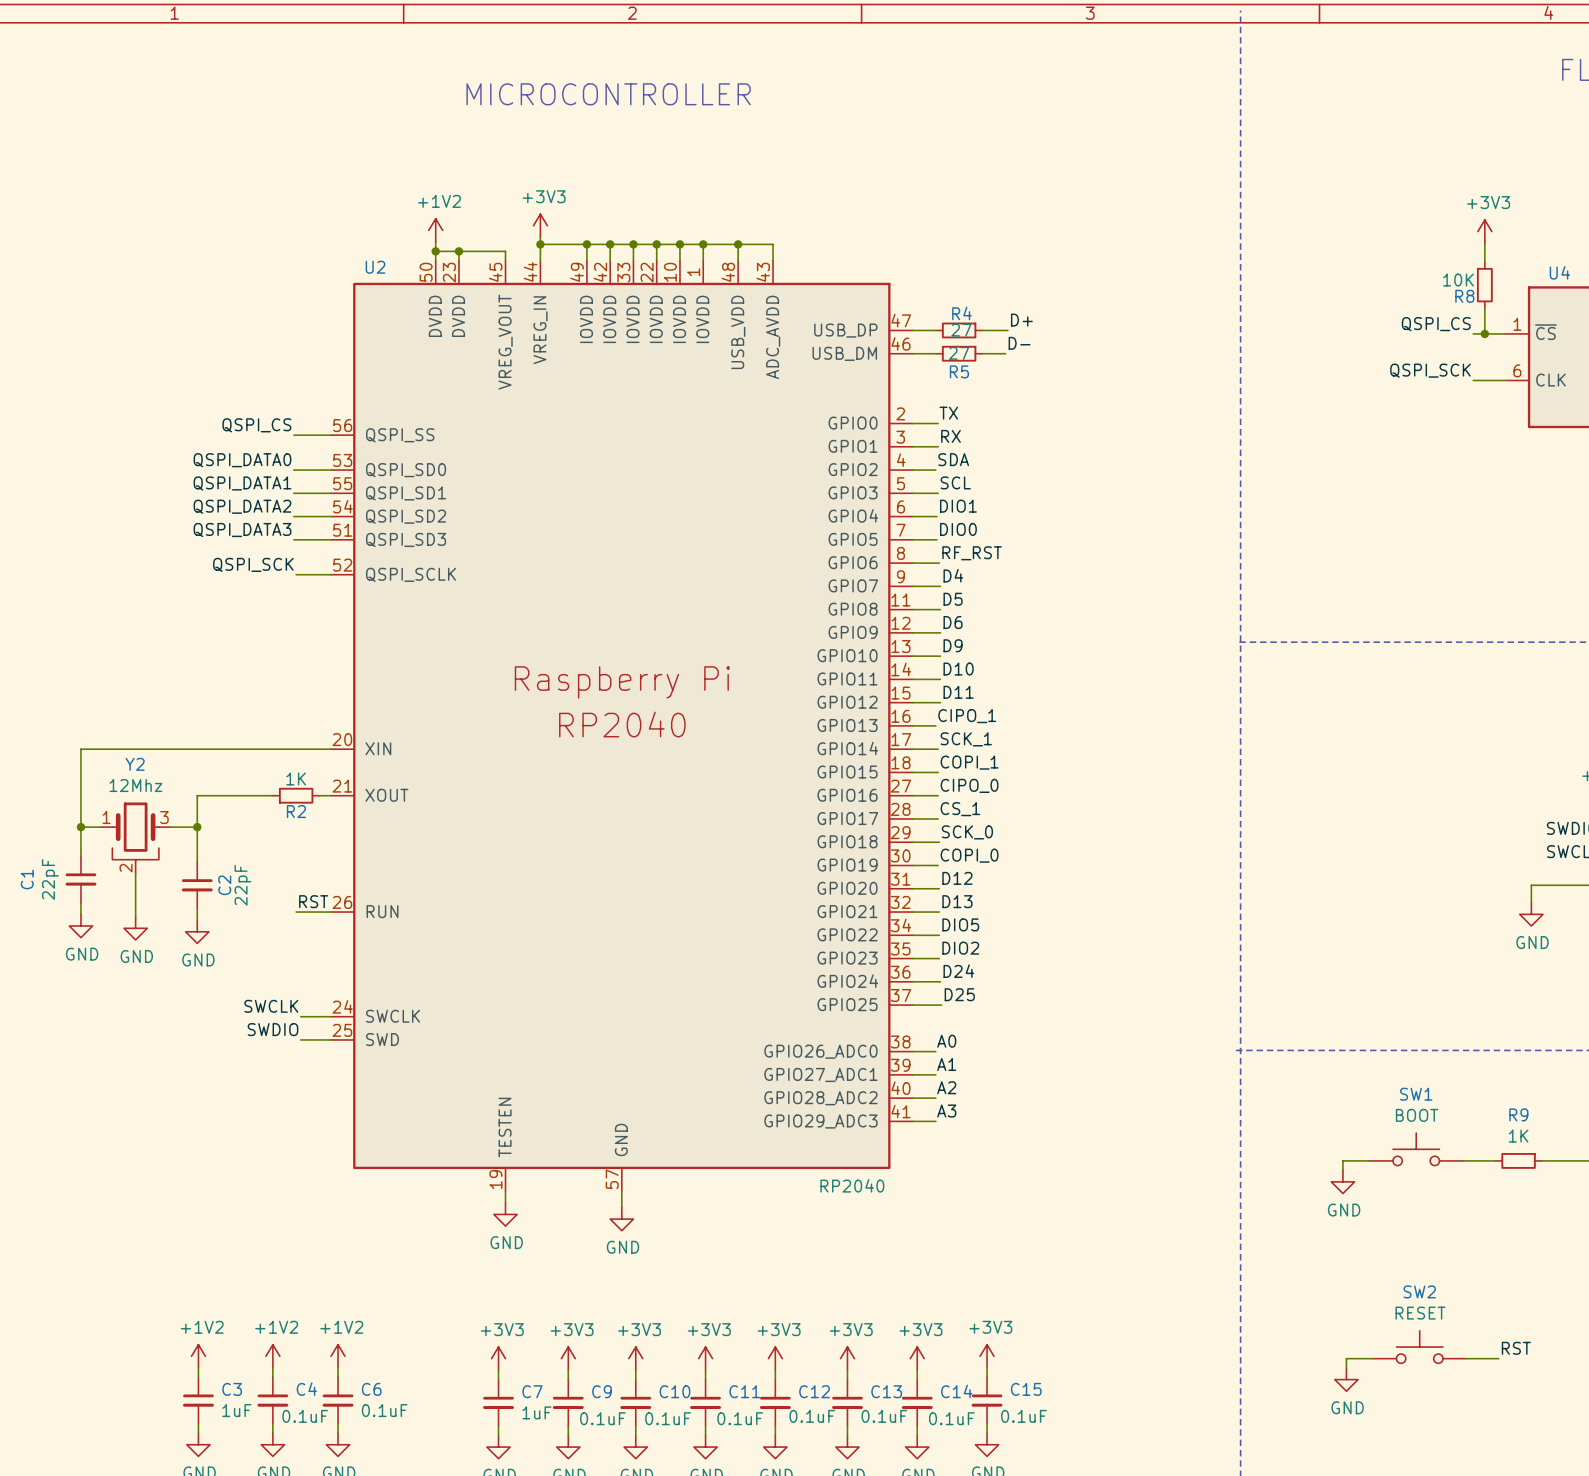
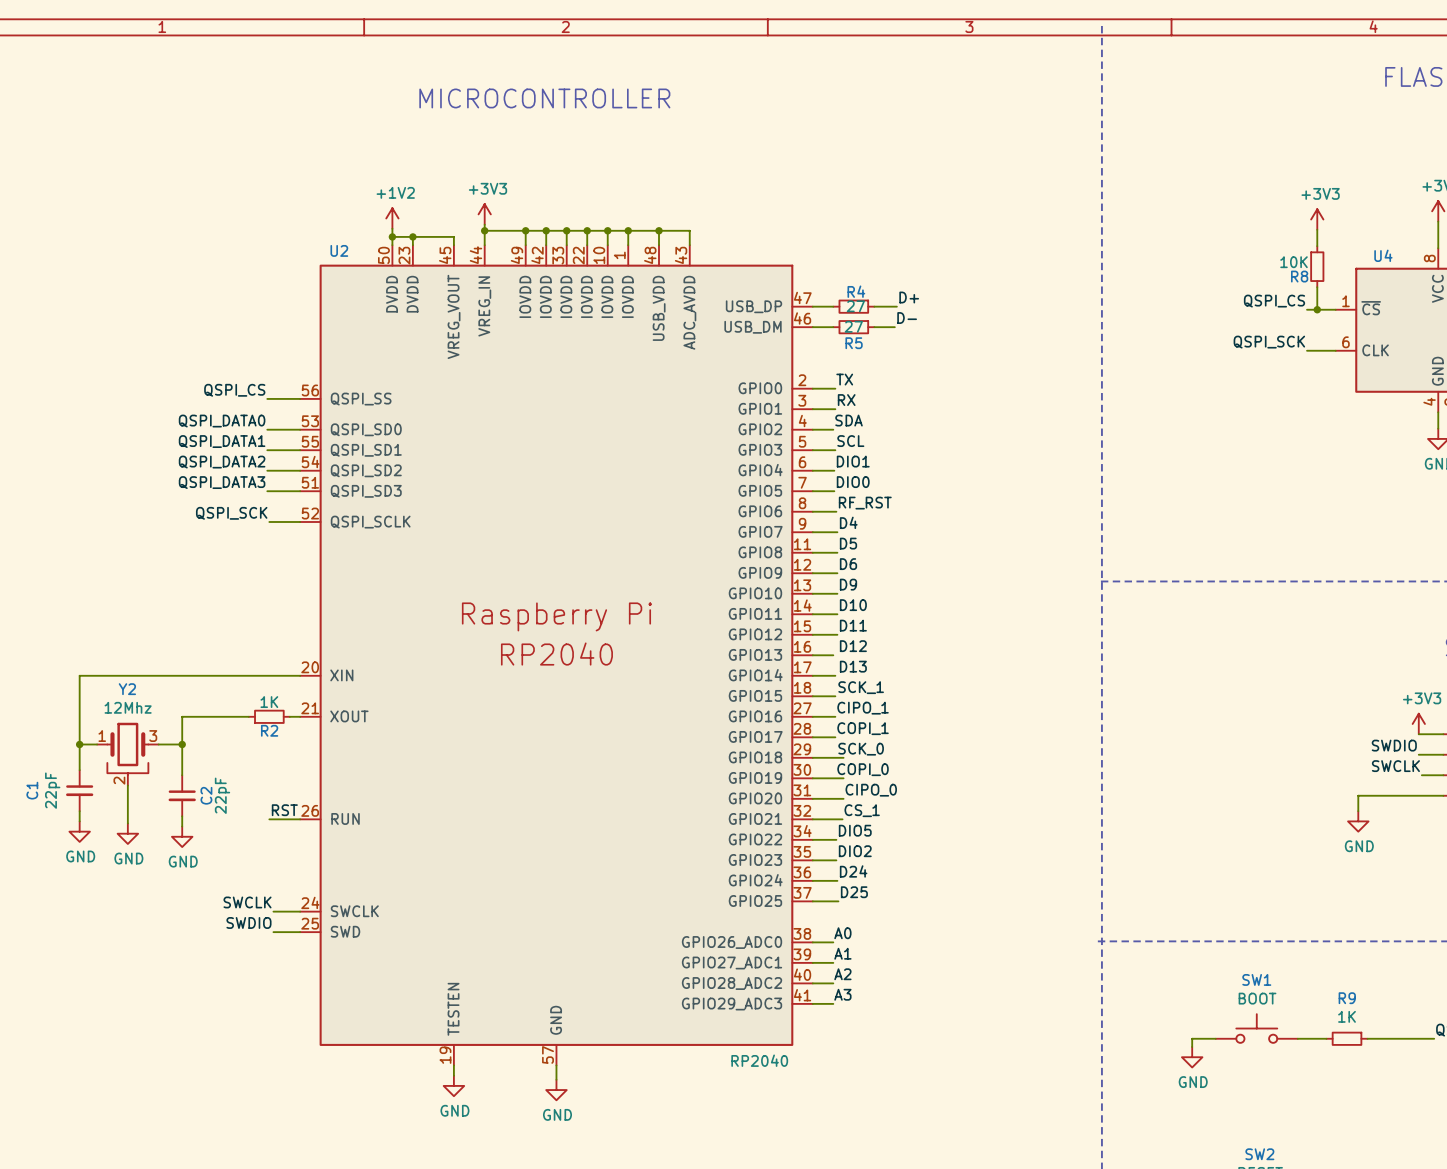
label: CIPO_1 (967, 716) -> none
label position: SCK_1 (966, 739) -> SCK_1 (861, 687)
label: COPI_1 (969, 762) -> none
label: CIPO_0 (969, 785) -> CIPO_1 (863, 708)
label: CS_1 (960, 809) -> COPI_1 (863, 728)
wire: none -> (836, 757) (843, 757)
wire: none -> (835, 778) (843, 778)
label position: D12 (957, 878) -> D12 (853, 646)
label: none -> CIPO_0 (871, 790)
wire: none -> (836, 798) (843, 798)
label position: D13 (957, 901) -> D13 (853, 666)
label: none -> CS_1 (862, 810)
wire: none -> (836, 819) (842, 819)

